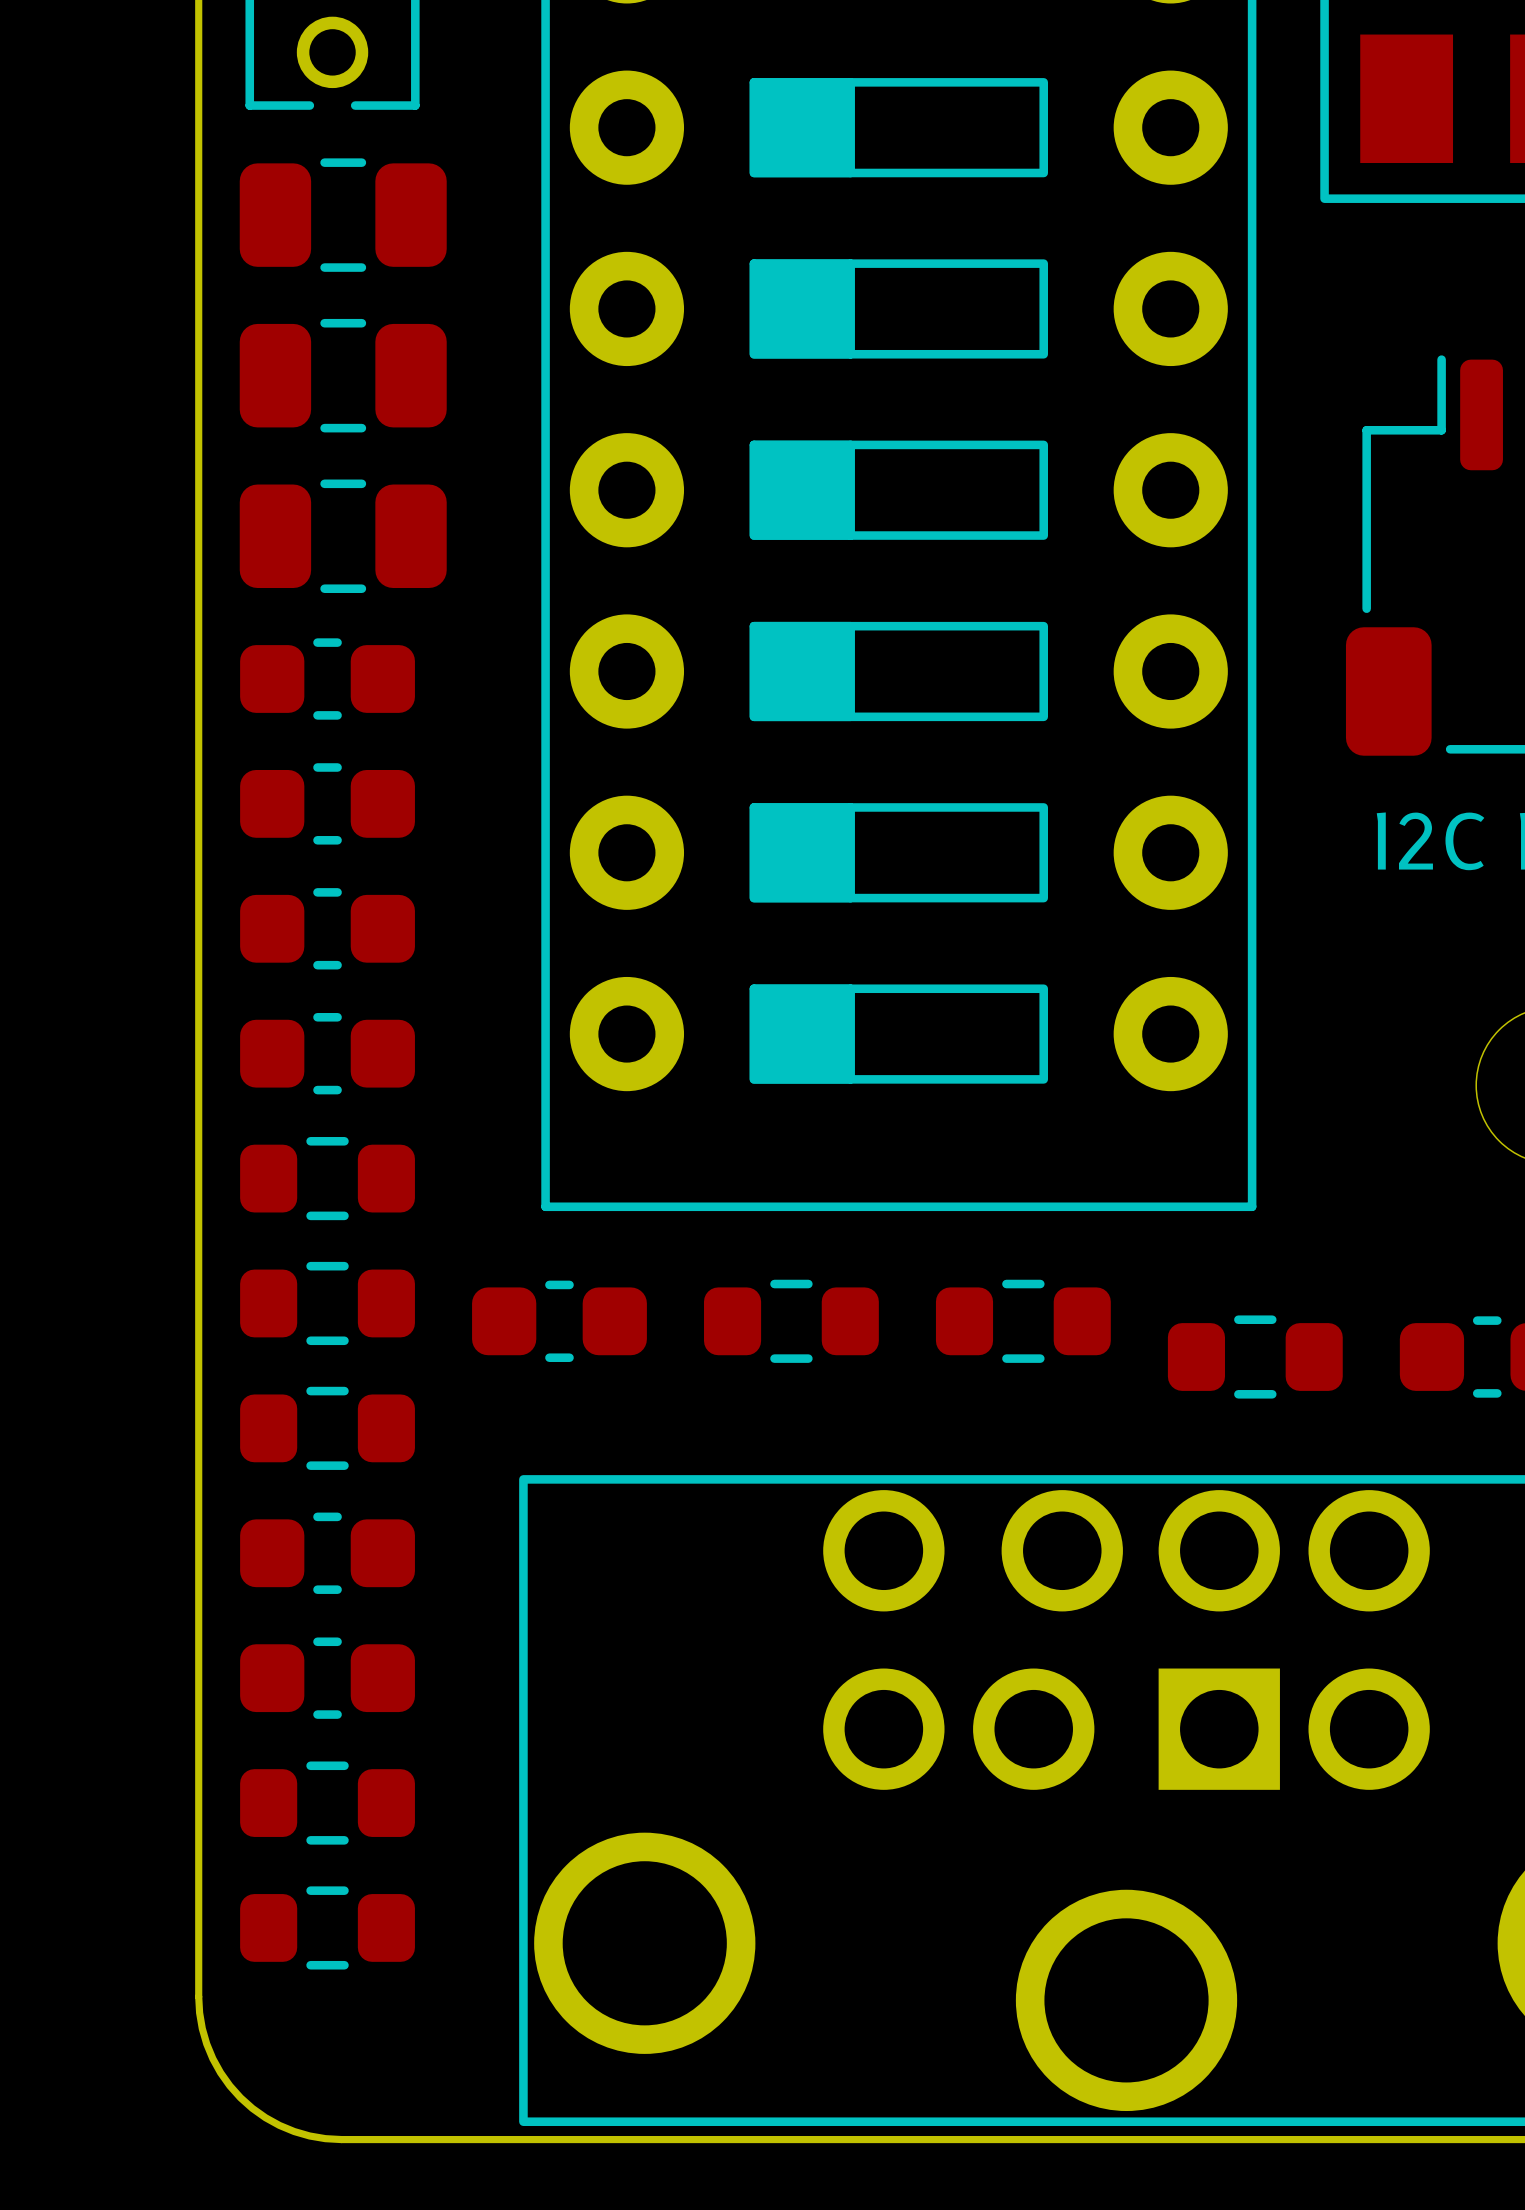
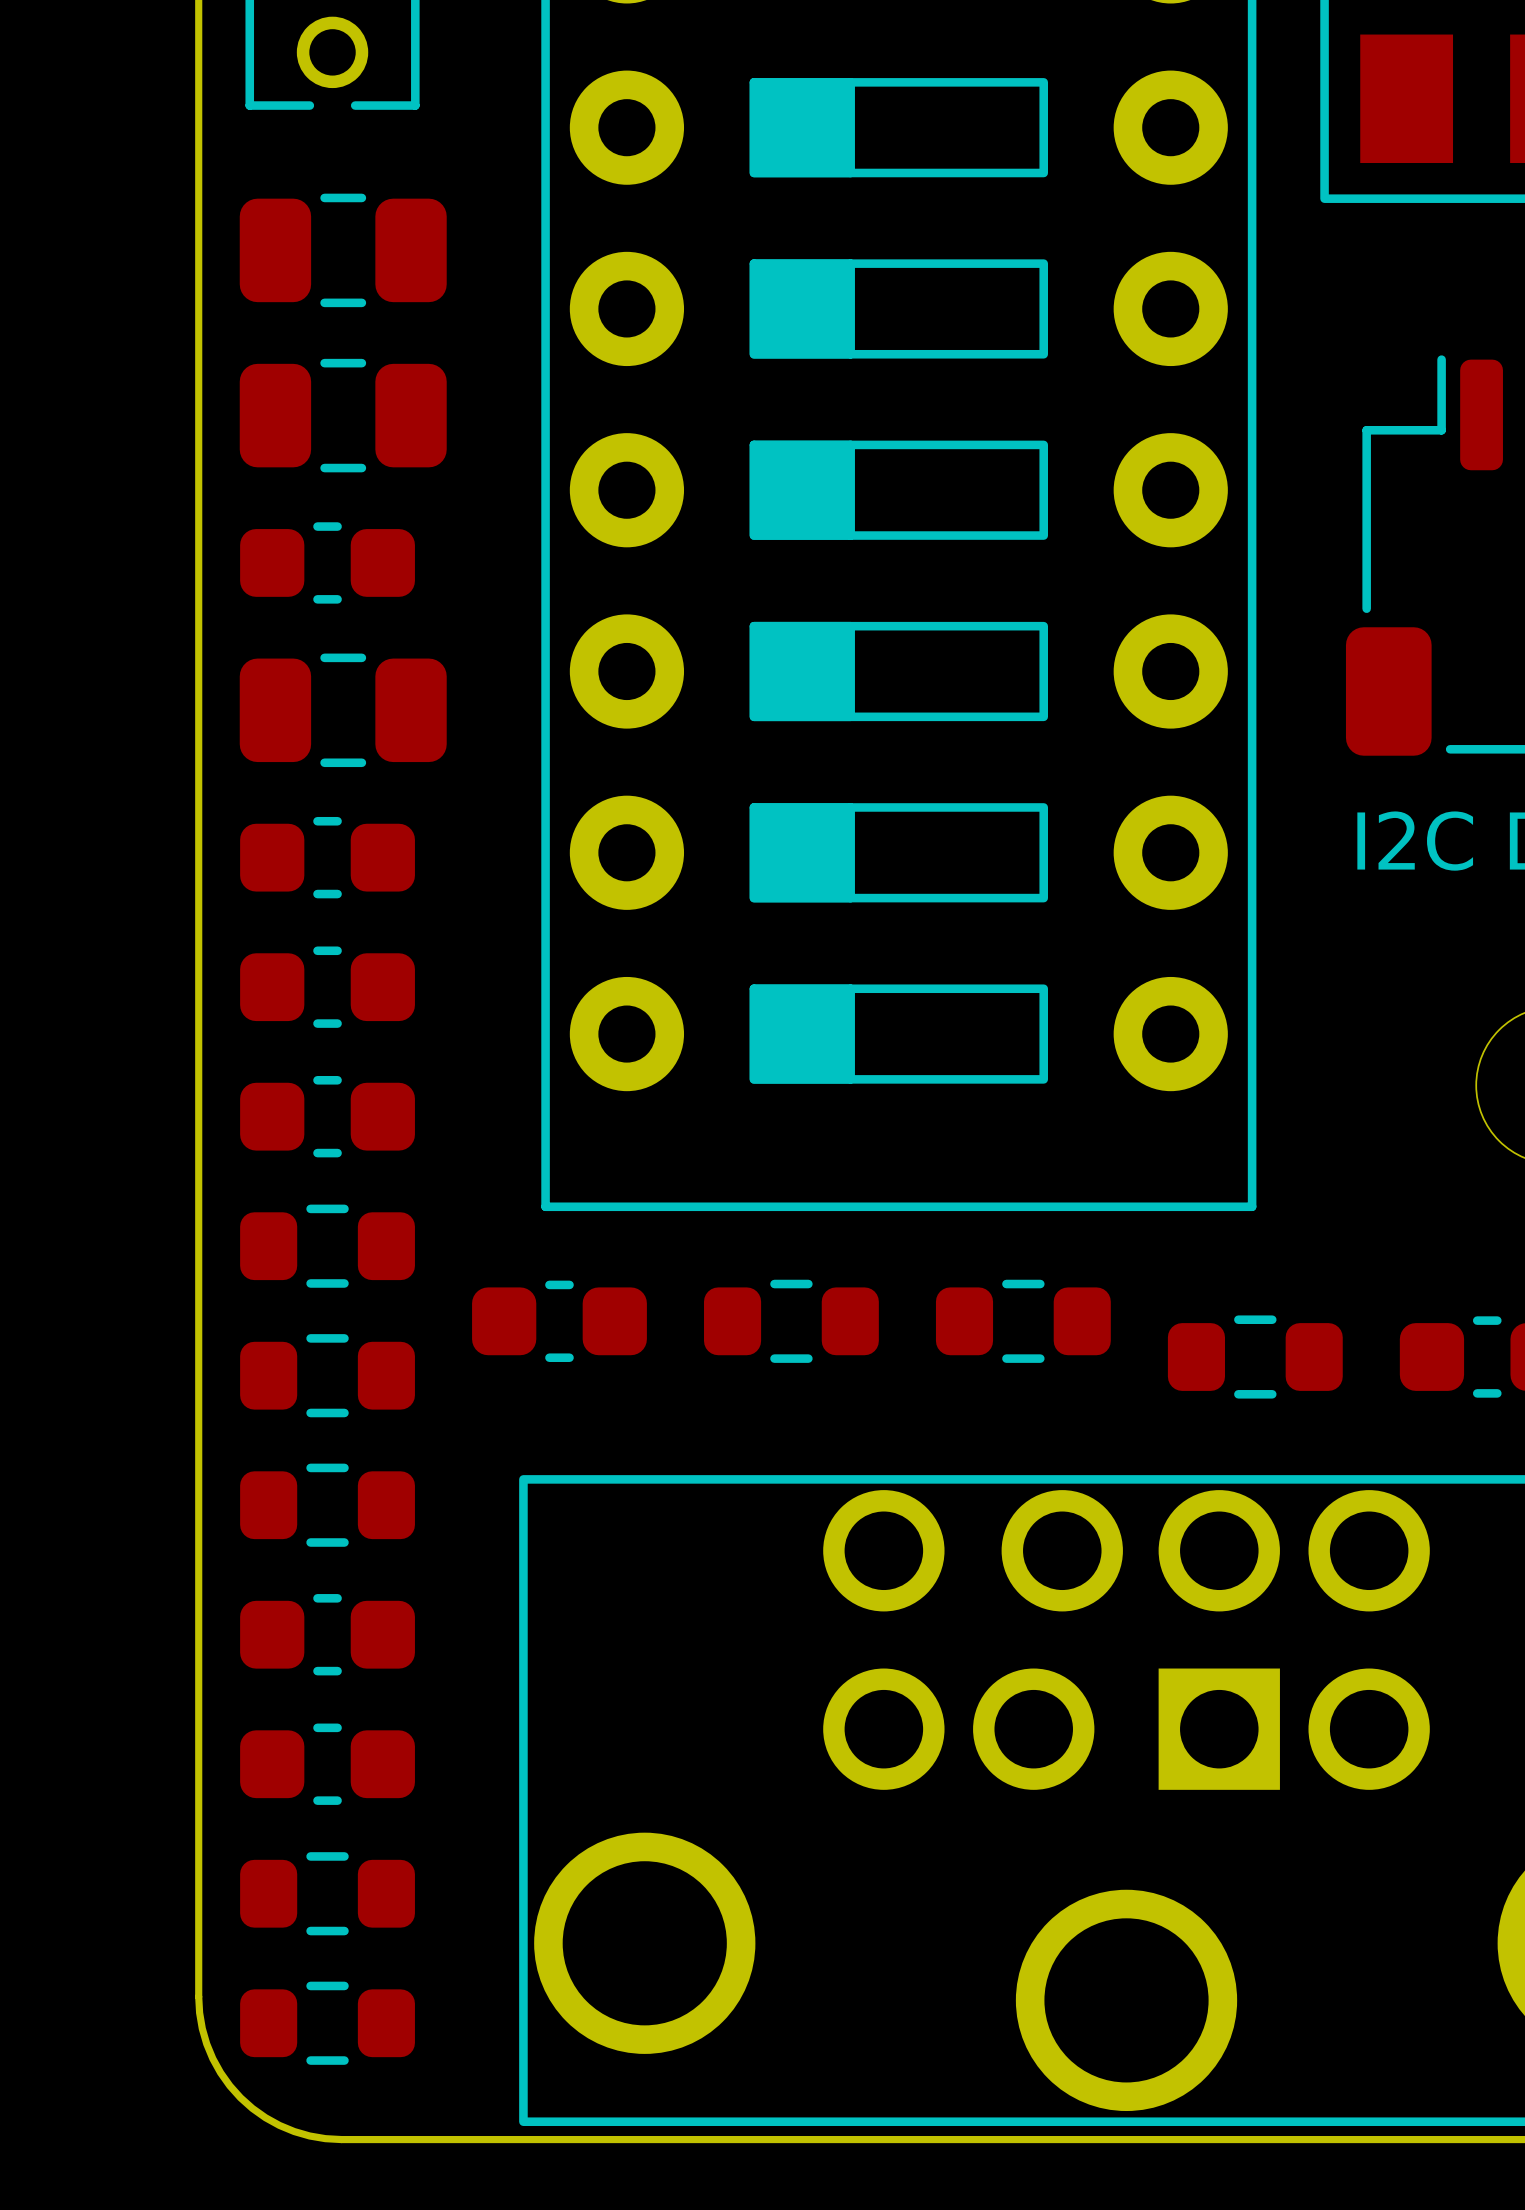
part position: (343, 215) -> (343, 250)
part position: (343, 375) -> (343, 415)
part footprint: [239, 479, 447, 593] -> [240, 522, 415, 604]
part footprint: [240, 638, 415, 720] -> [239, 653, 447, 768]
part: (327, 803) -> none
part: none -> (327, 857)
part: (327, 928) -> none
part: none -> (327, 987)
part: (327, 1053) -> none
part: none -> (327, 1116)
part: (327, 1178) -> none
part: none -> (327, 1246)
part: (327, 1303) -> none
part: none -> (327, 1375)
part: (327, 1428) -> none
part: none -> (327, 1505)
part: (327, 1553) -> none
part: none -> (327, 1634)
part: (327, 1678) -> none
part footprint: [240, 1761, 415, 1845] -> [240, 1723, 415, 1805]
part position: (327, 1927) -> (327, 1893)
part: none -> (327, 2023)

